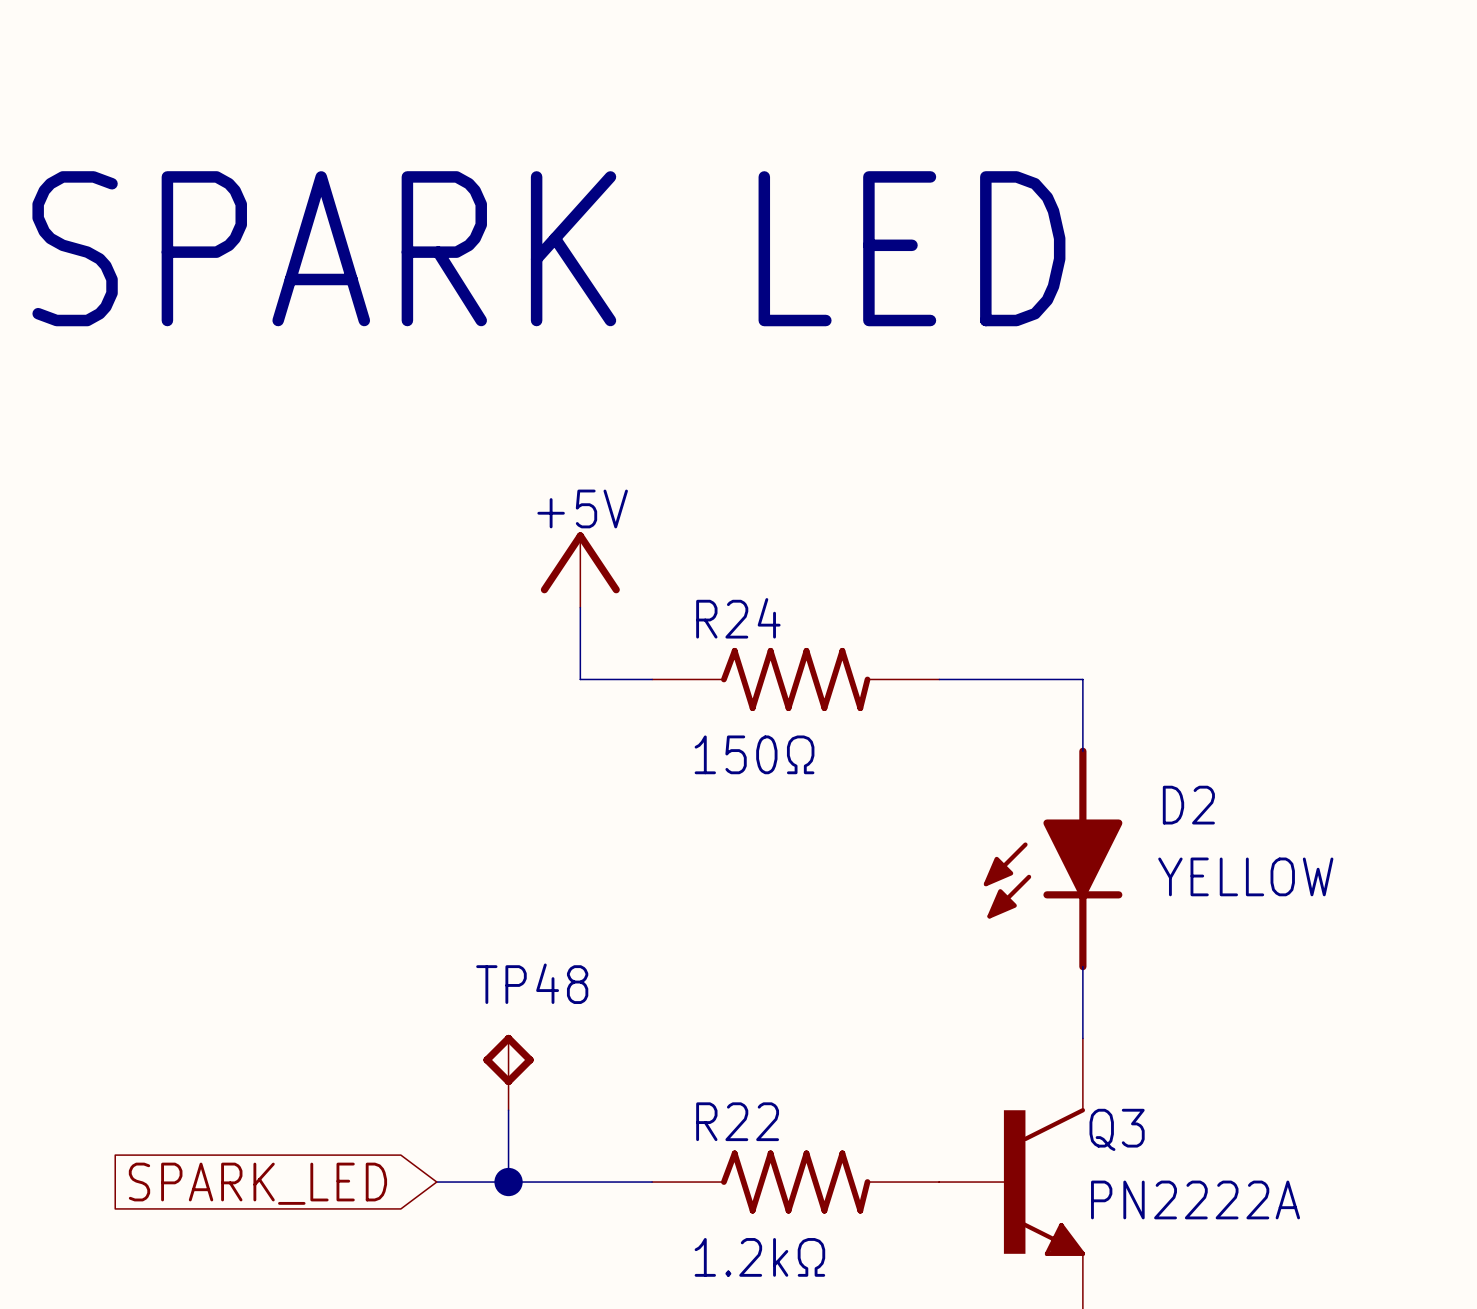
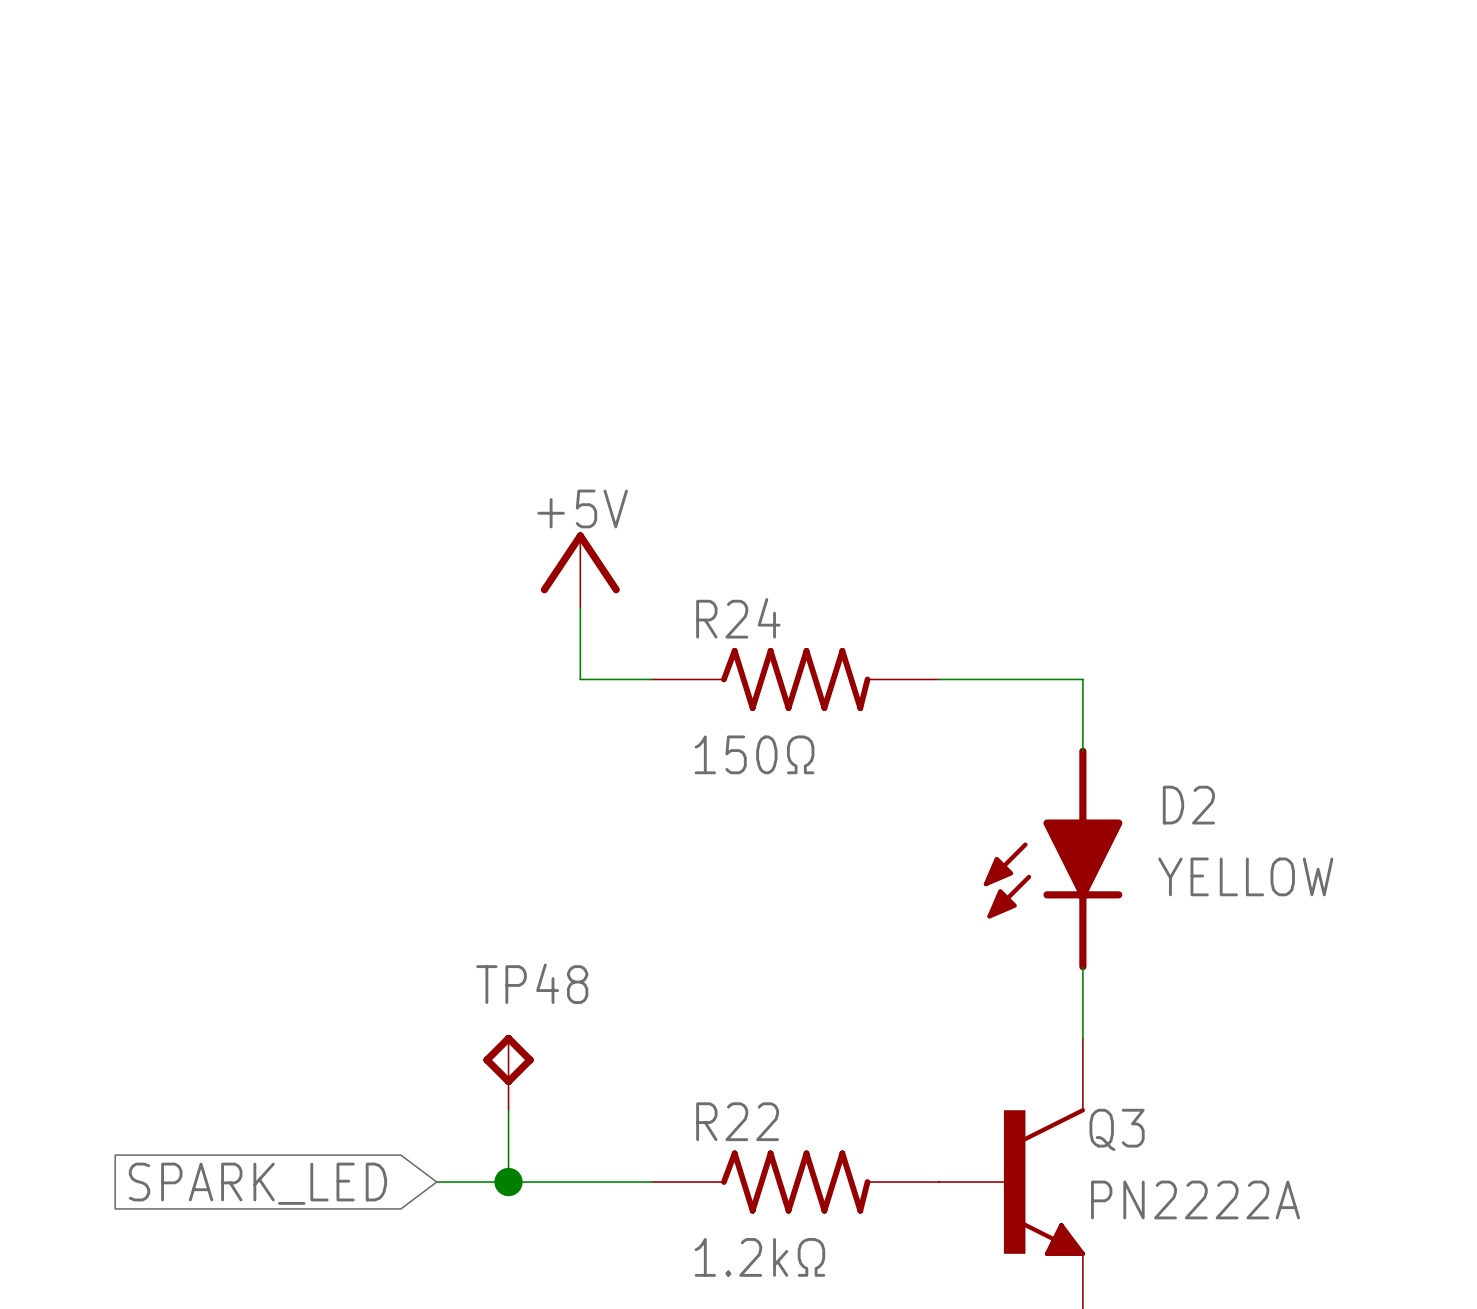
text: SPARK LED (548, 248) -> none

